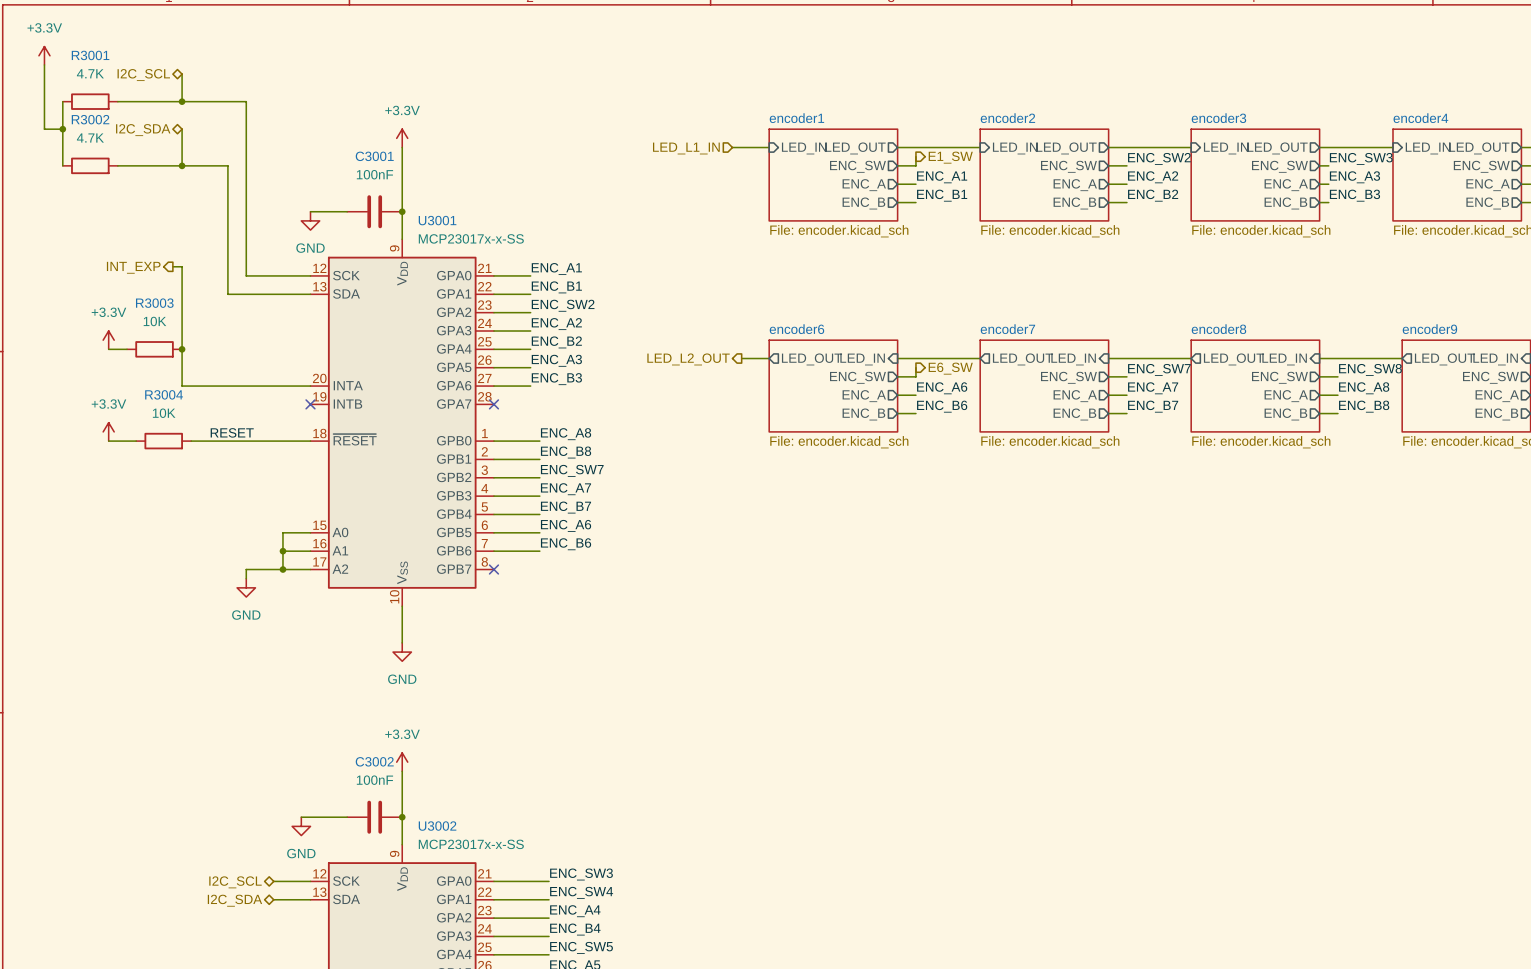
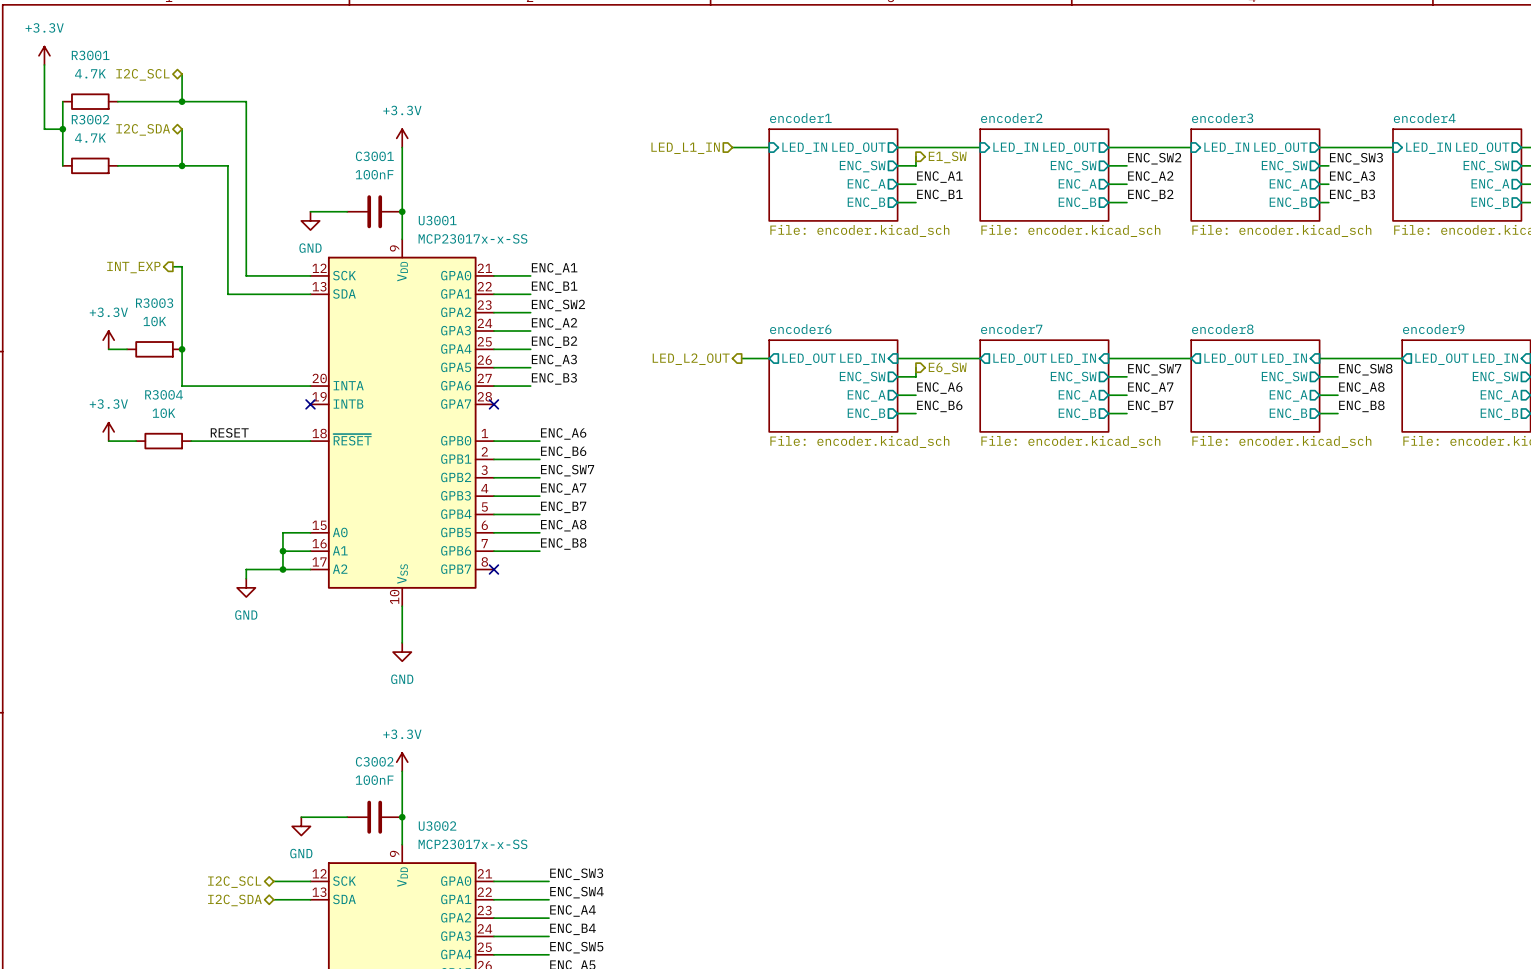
label: ENC_A8 (566, 434) -> ENC_A6 (563, 433)
label: ENC_B8 (566, 452) -> ENC_B6 (563, 452)
label: ENC_A6 (566, 525) -> ENC_A8 (563, 525)
label: ENC_B6 (566, 544) -> ENC_B8 (563, 544)

